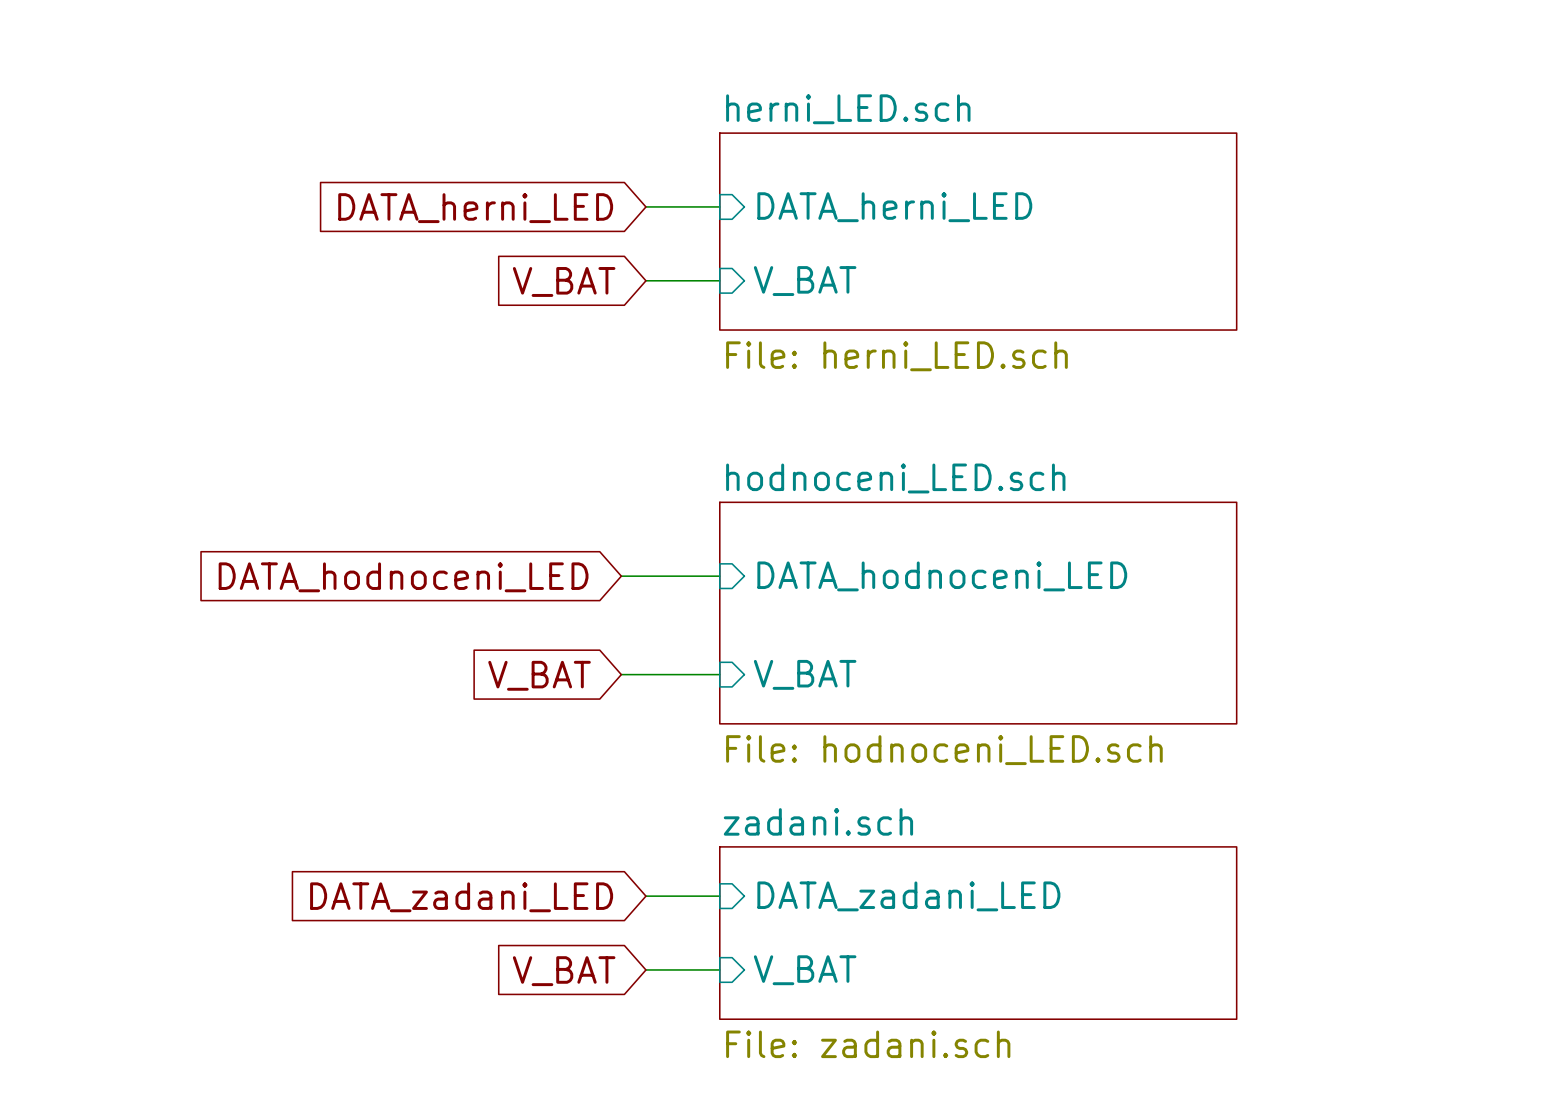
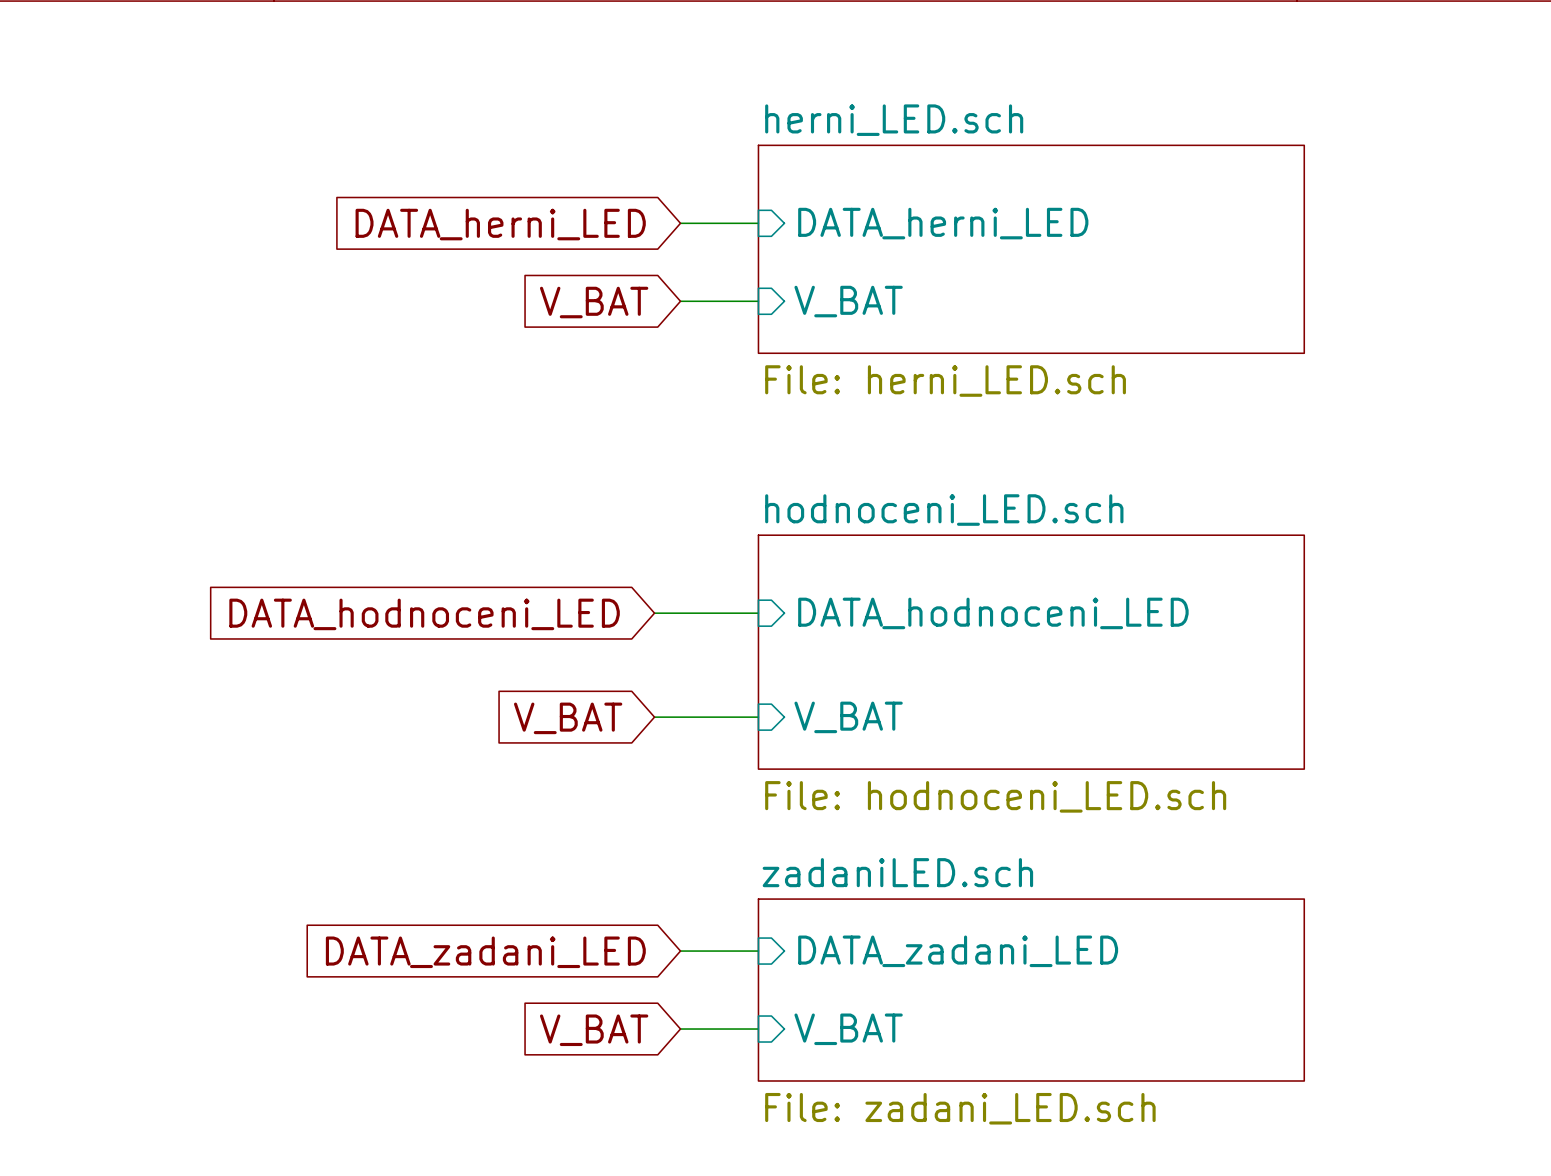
sheet zadani.sch name: zadani.sch (818, 821) -> zadaniLED.sch (897, 872)
sheet zadani.sch value: File: zadani.sch (868, 1044) -> File: zadani_LED.sch (960, 1108)

